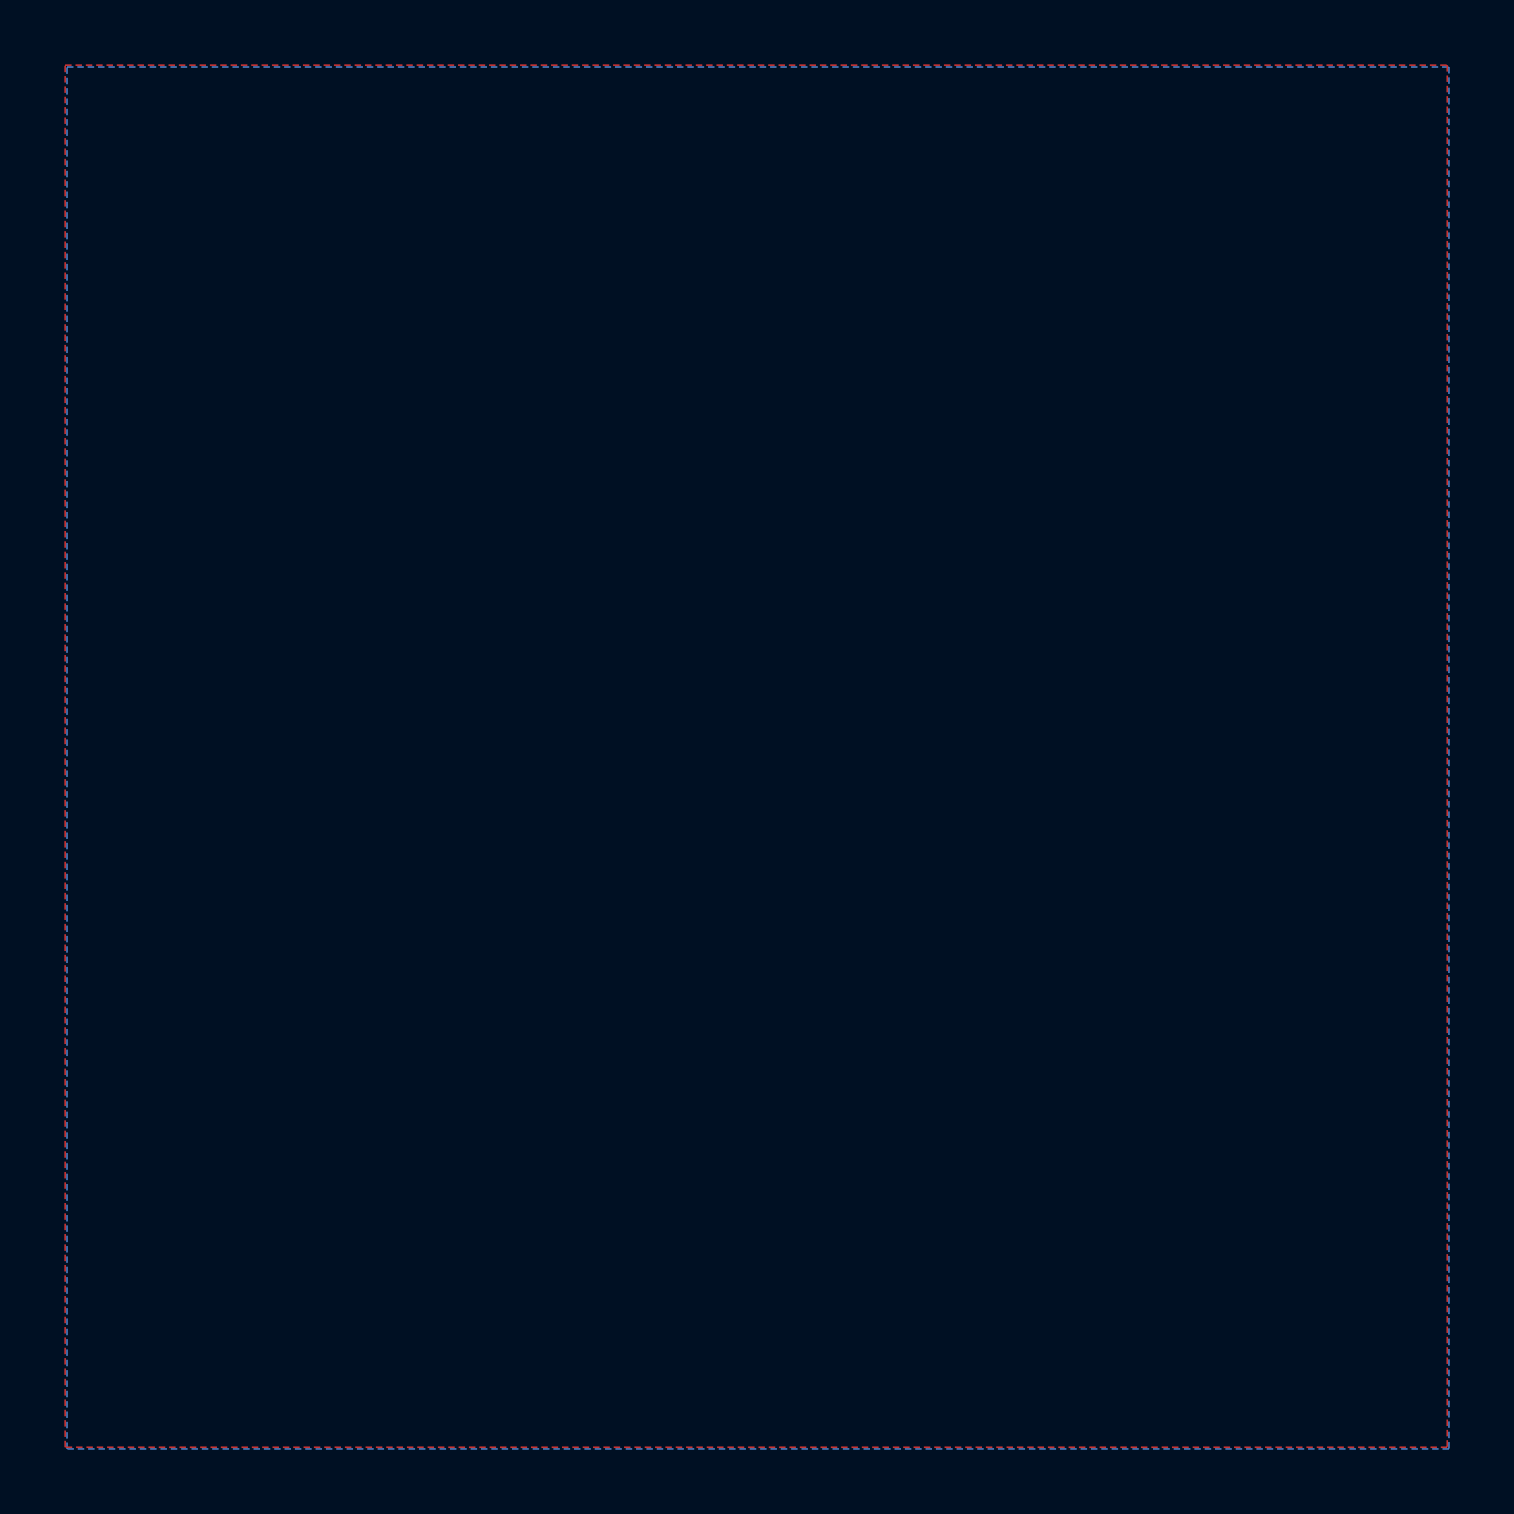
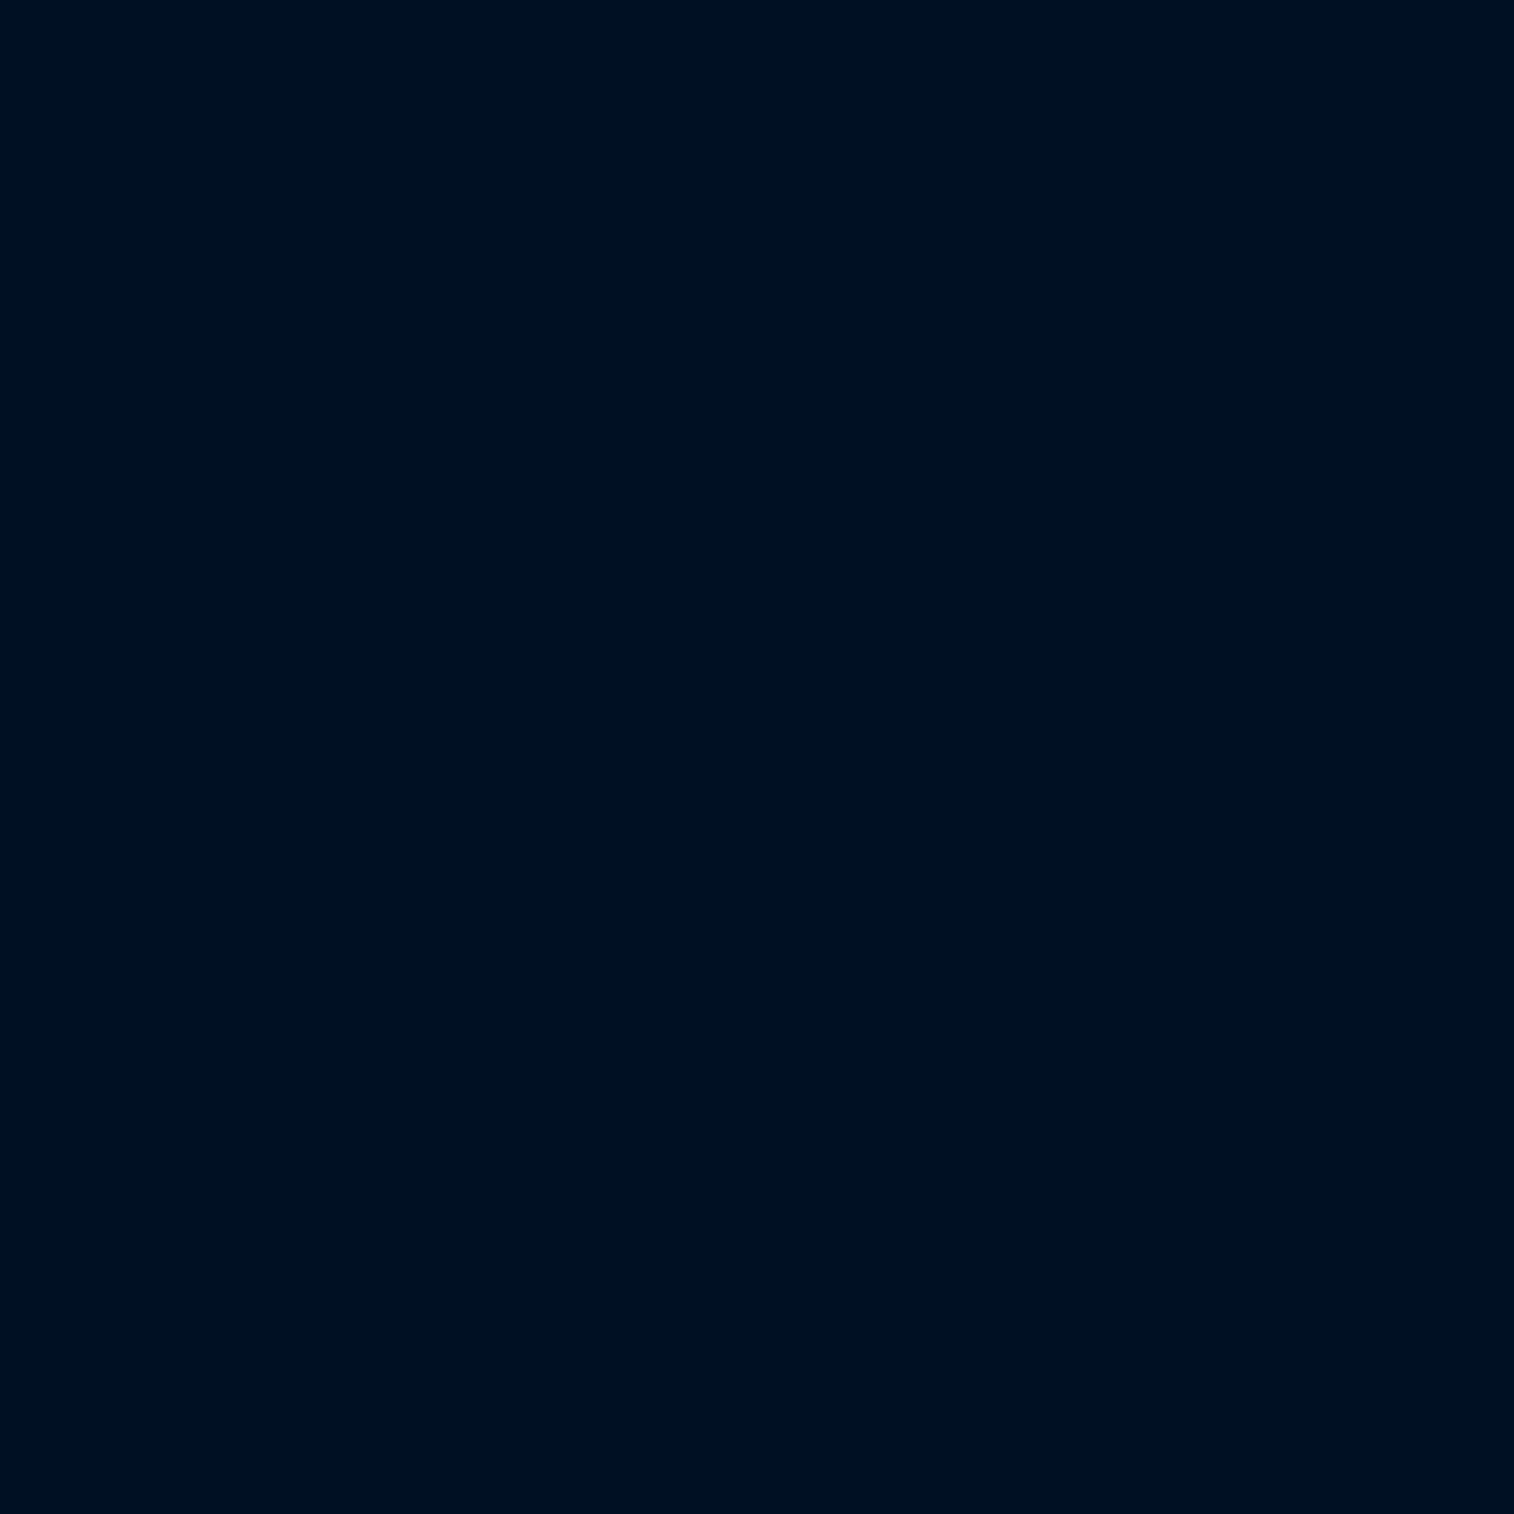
top zone outline: (65, 65) (65, 1447) (1447, 1447) (1447, 65) (65, 65) -> none
bottom zone outline: (67, 67) (67, 1448) (1448, 1448) (1448, 67) (67, 67) -> none

